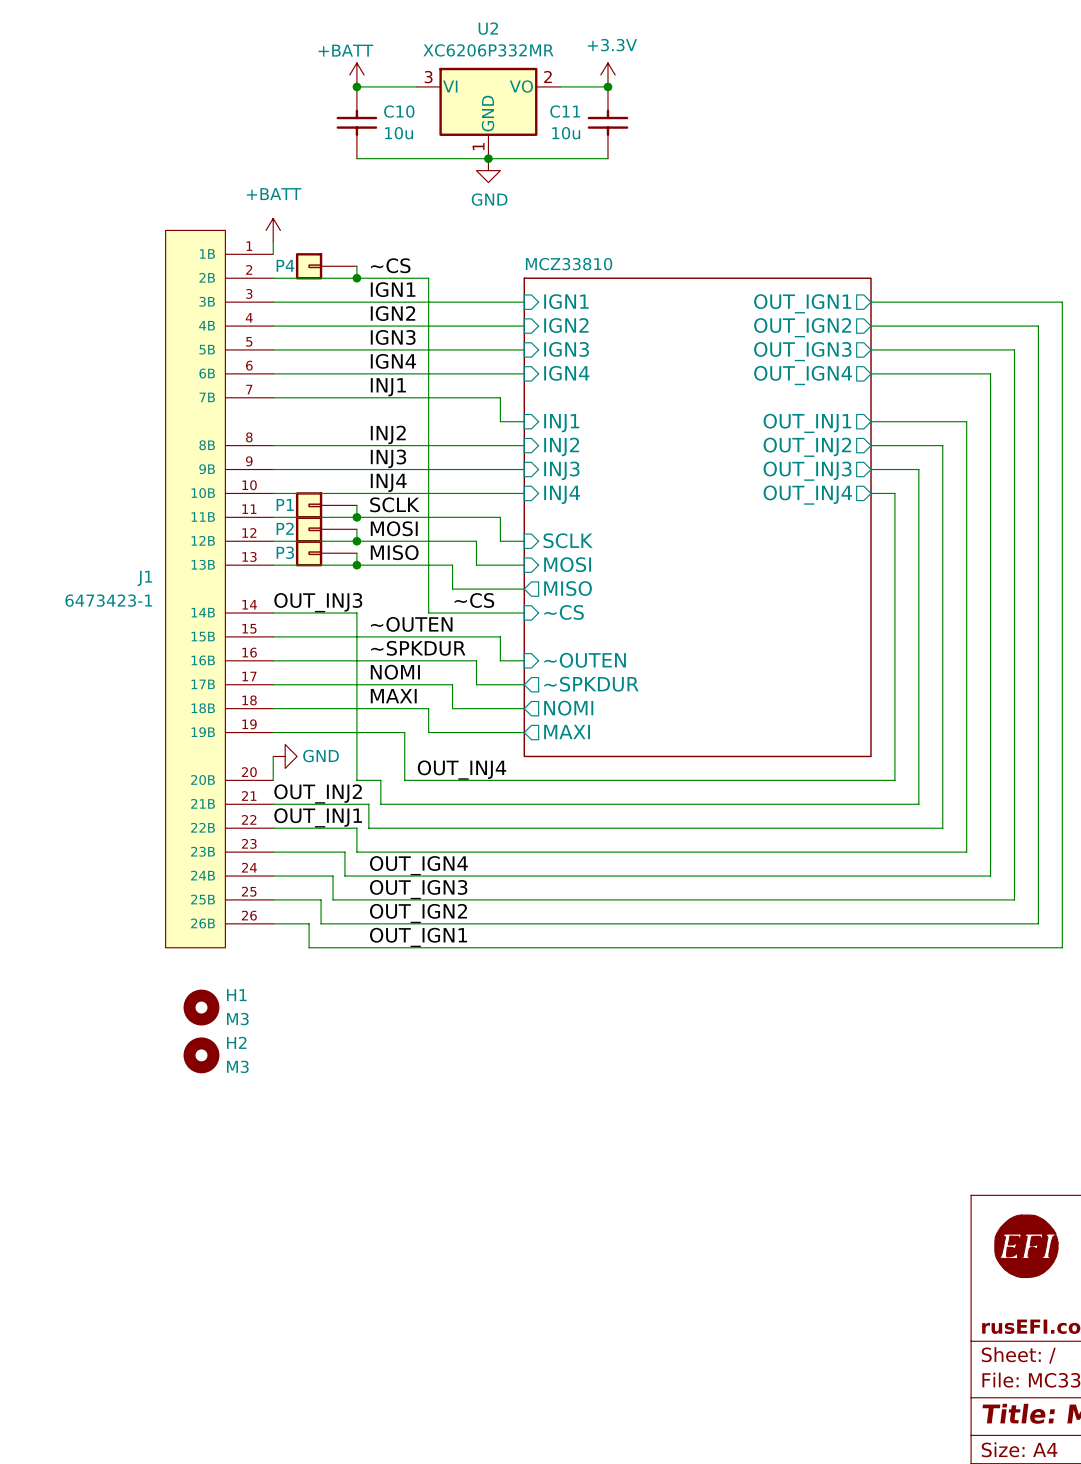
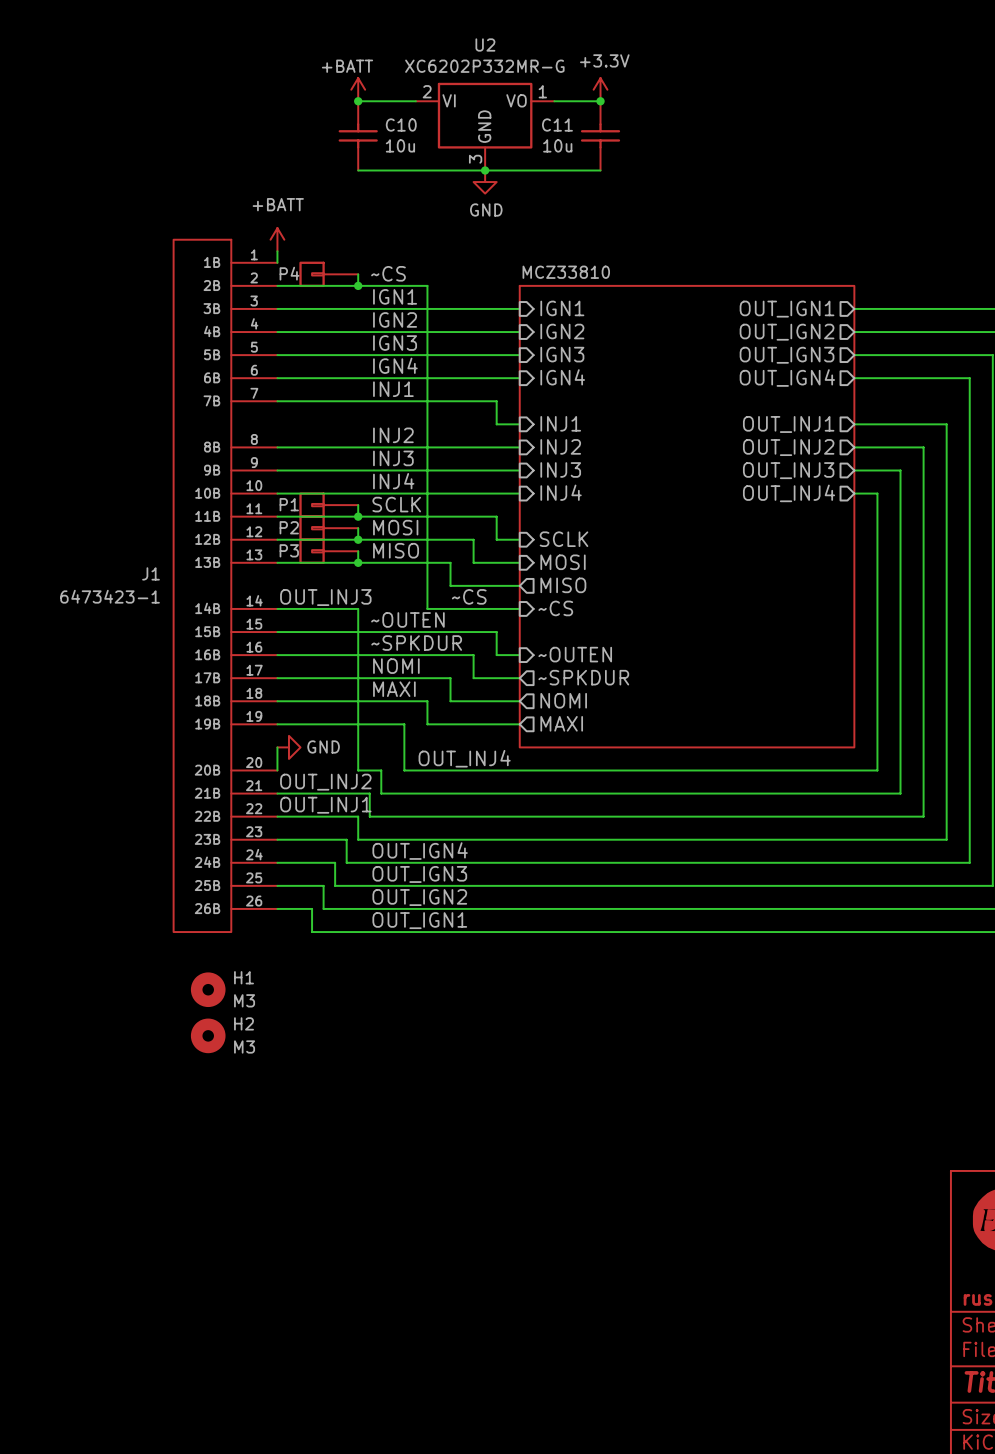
U2 value: XC6206P332MR (488, 50) -> XC6202P332MR-G (484, 66)
U2 pin number: 2 (547, 76) -> 1 (542, 91)
U2 pin number: 3 (428, 77) -> 2 (427, 91)
U2 pin number: 1 (478, 146) -> 3 (475, 159)

